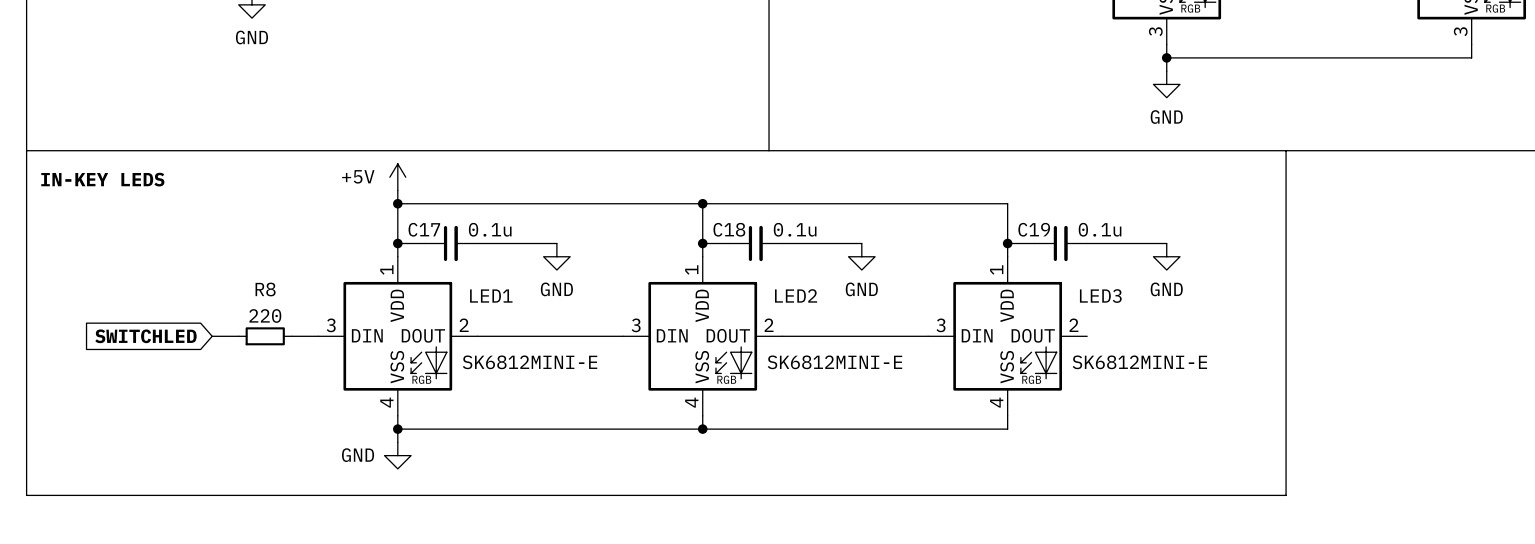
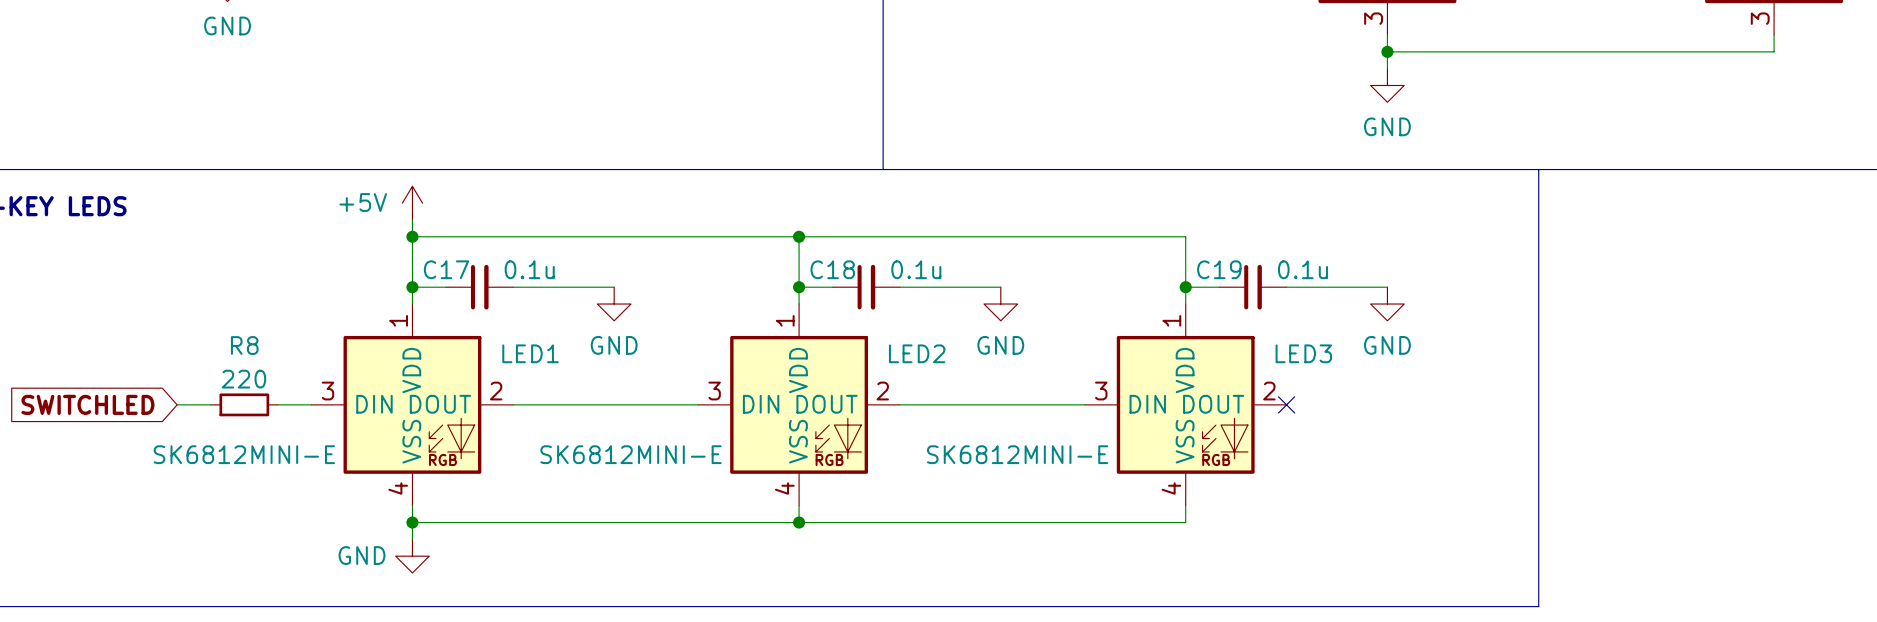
no-connect mark: none -> (1286, 404)
LED1 value position: SK6812MINI-E (530, 362) -> SK6812MINI-E (244, 454)
LED2 value position: SK6812MINI-E (834, 362) -> SK6812MINI-E (630, 454)
LED3 value position: SK6812MINI-E (1139, 362) -> SK6812MINI-E (1017, 454)

